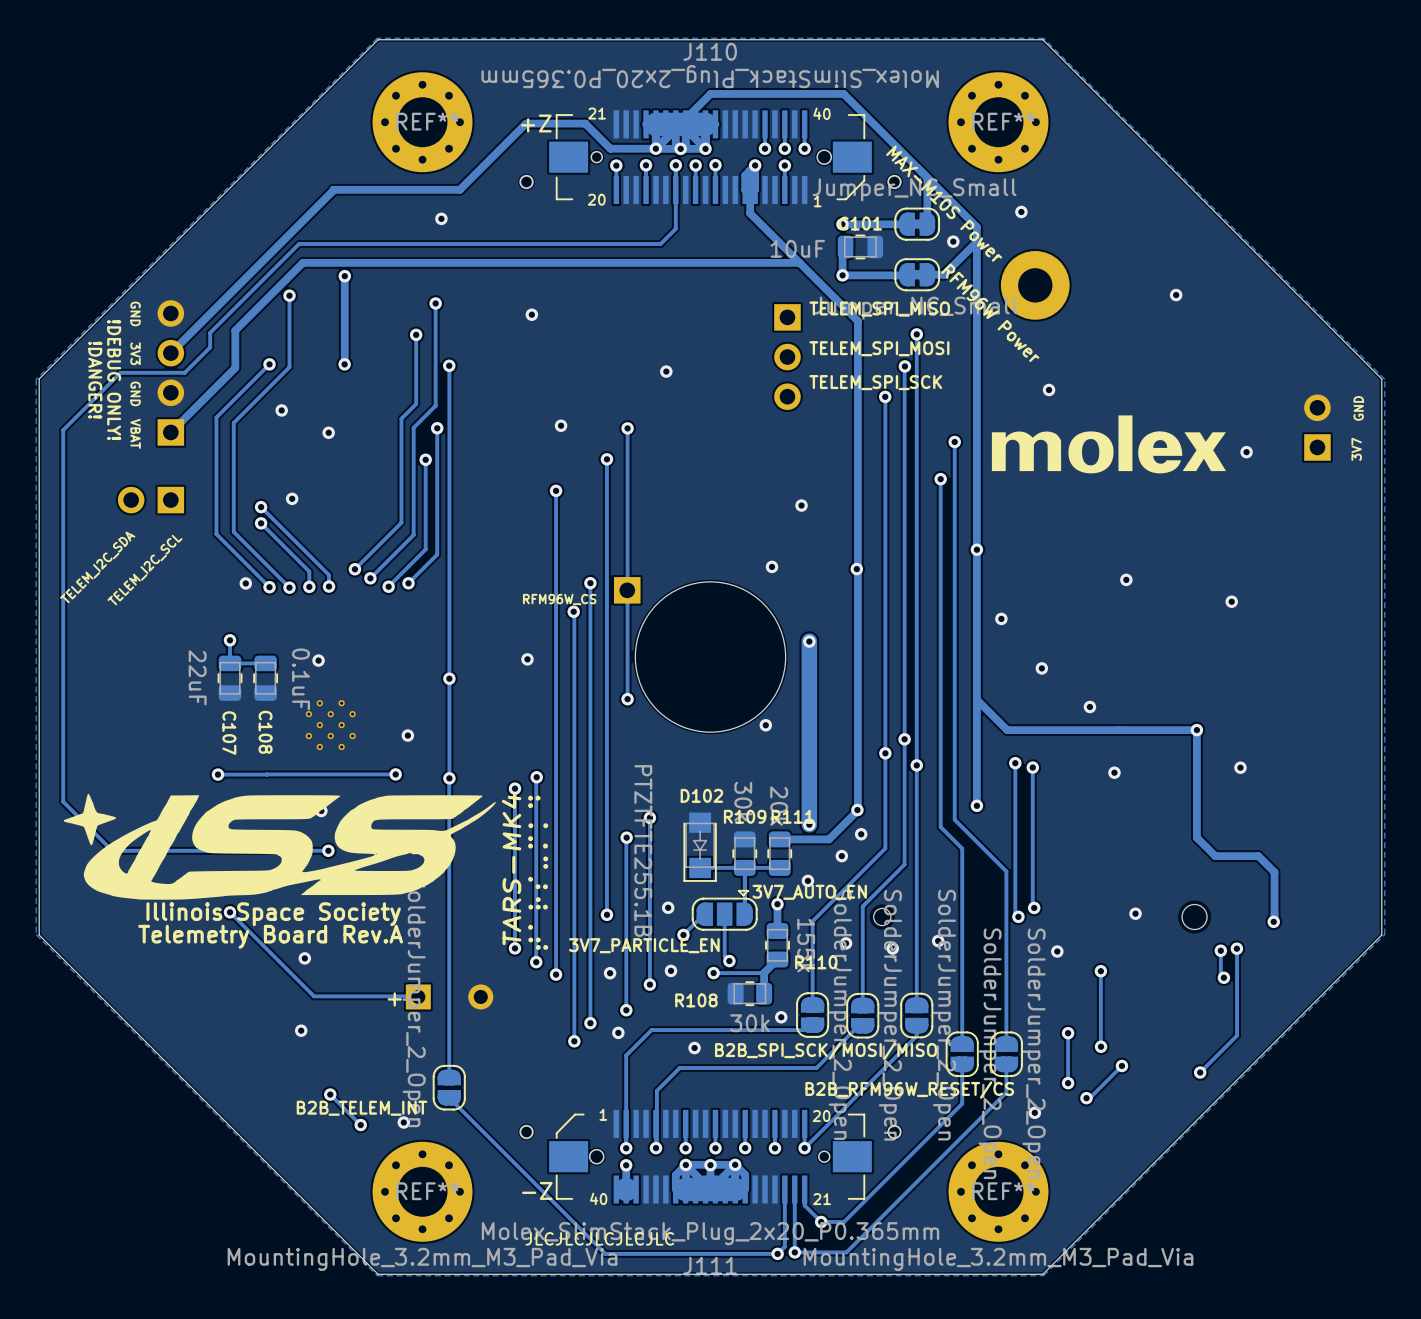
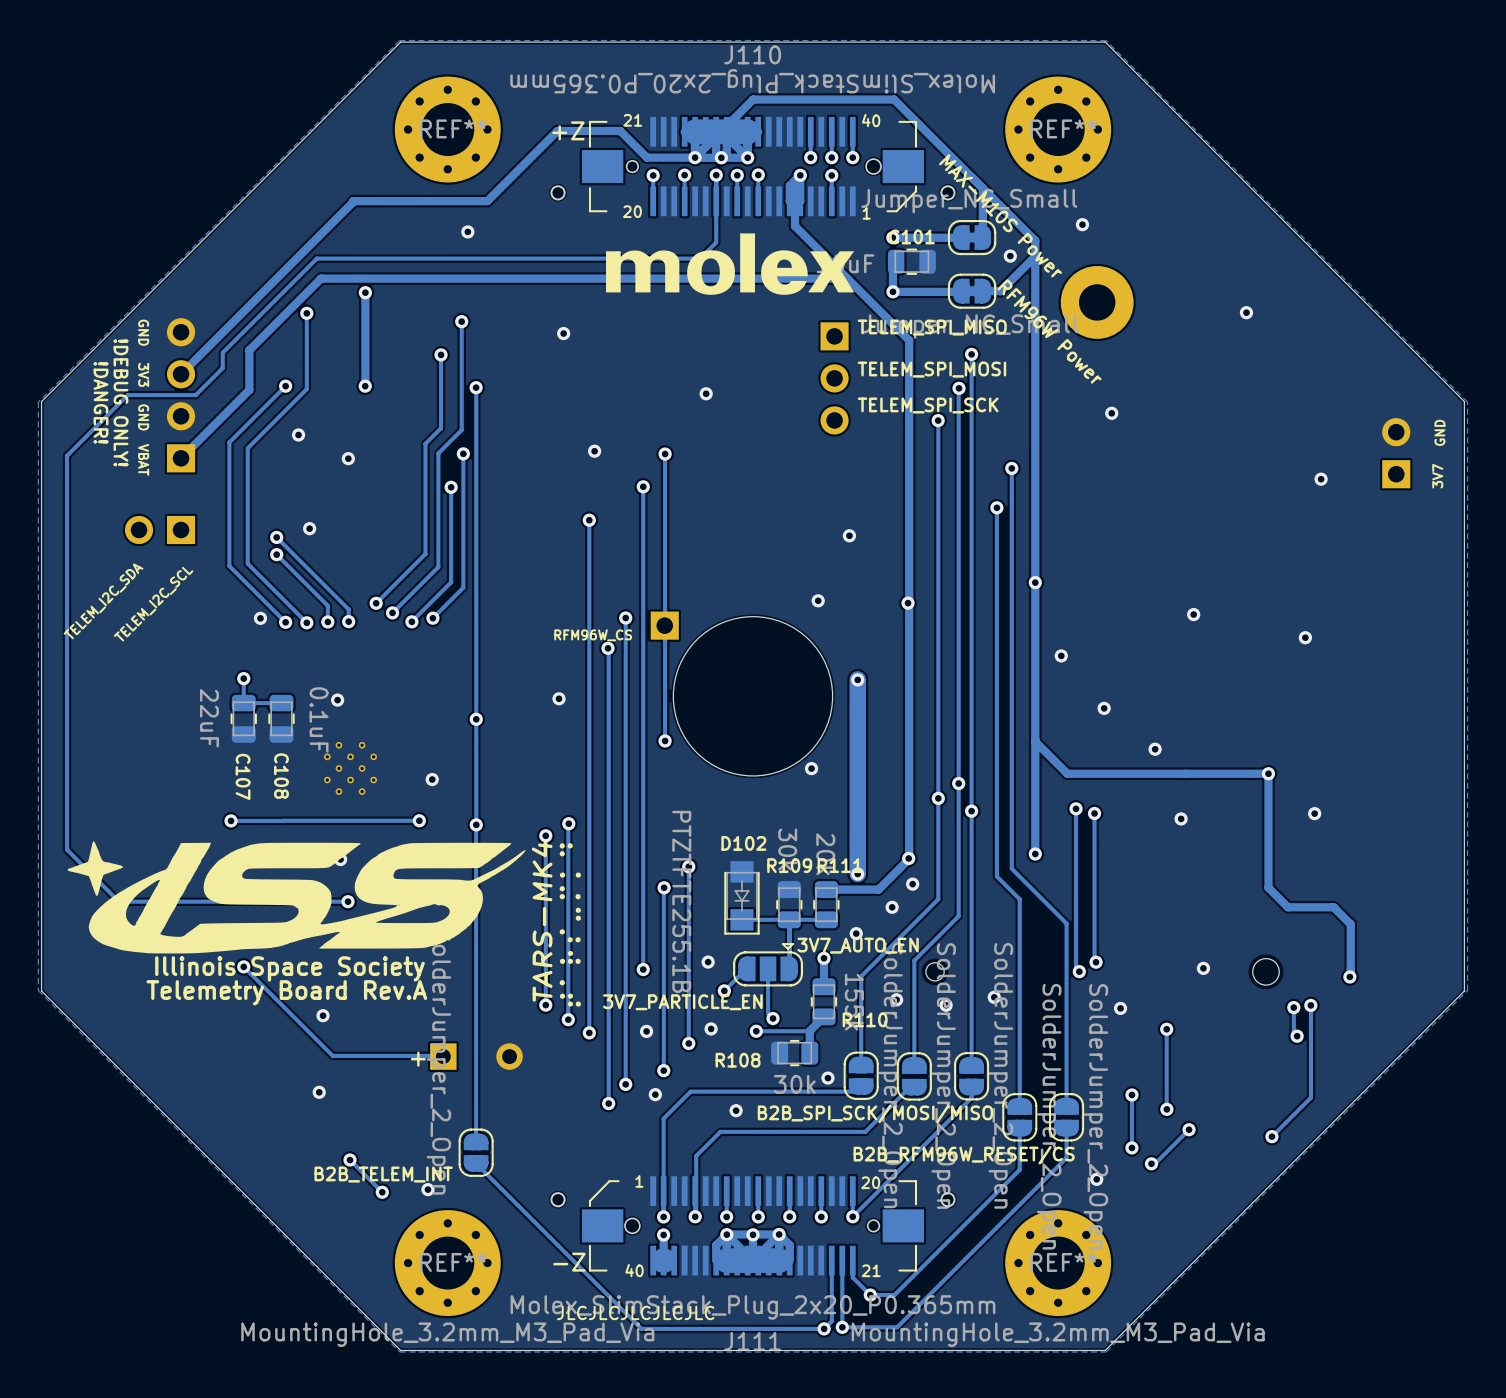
drawing: none -> [606, 233, 855, 295]
drawing: [991, 415, 1226, 474] -> none

